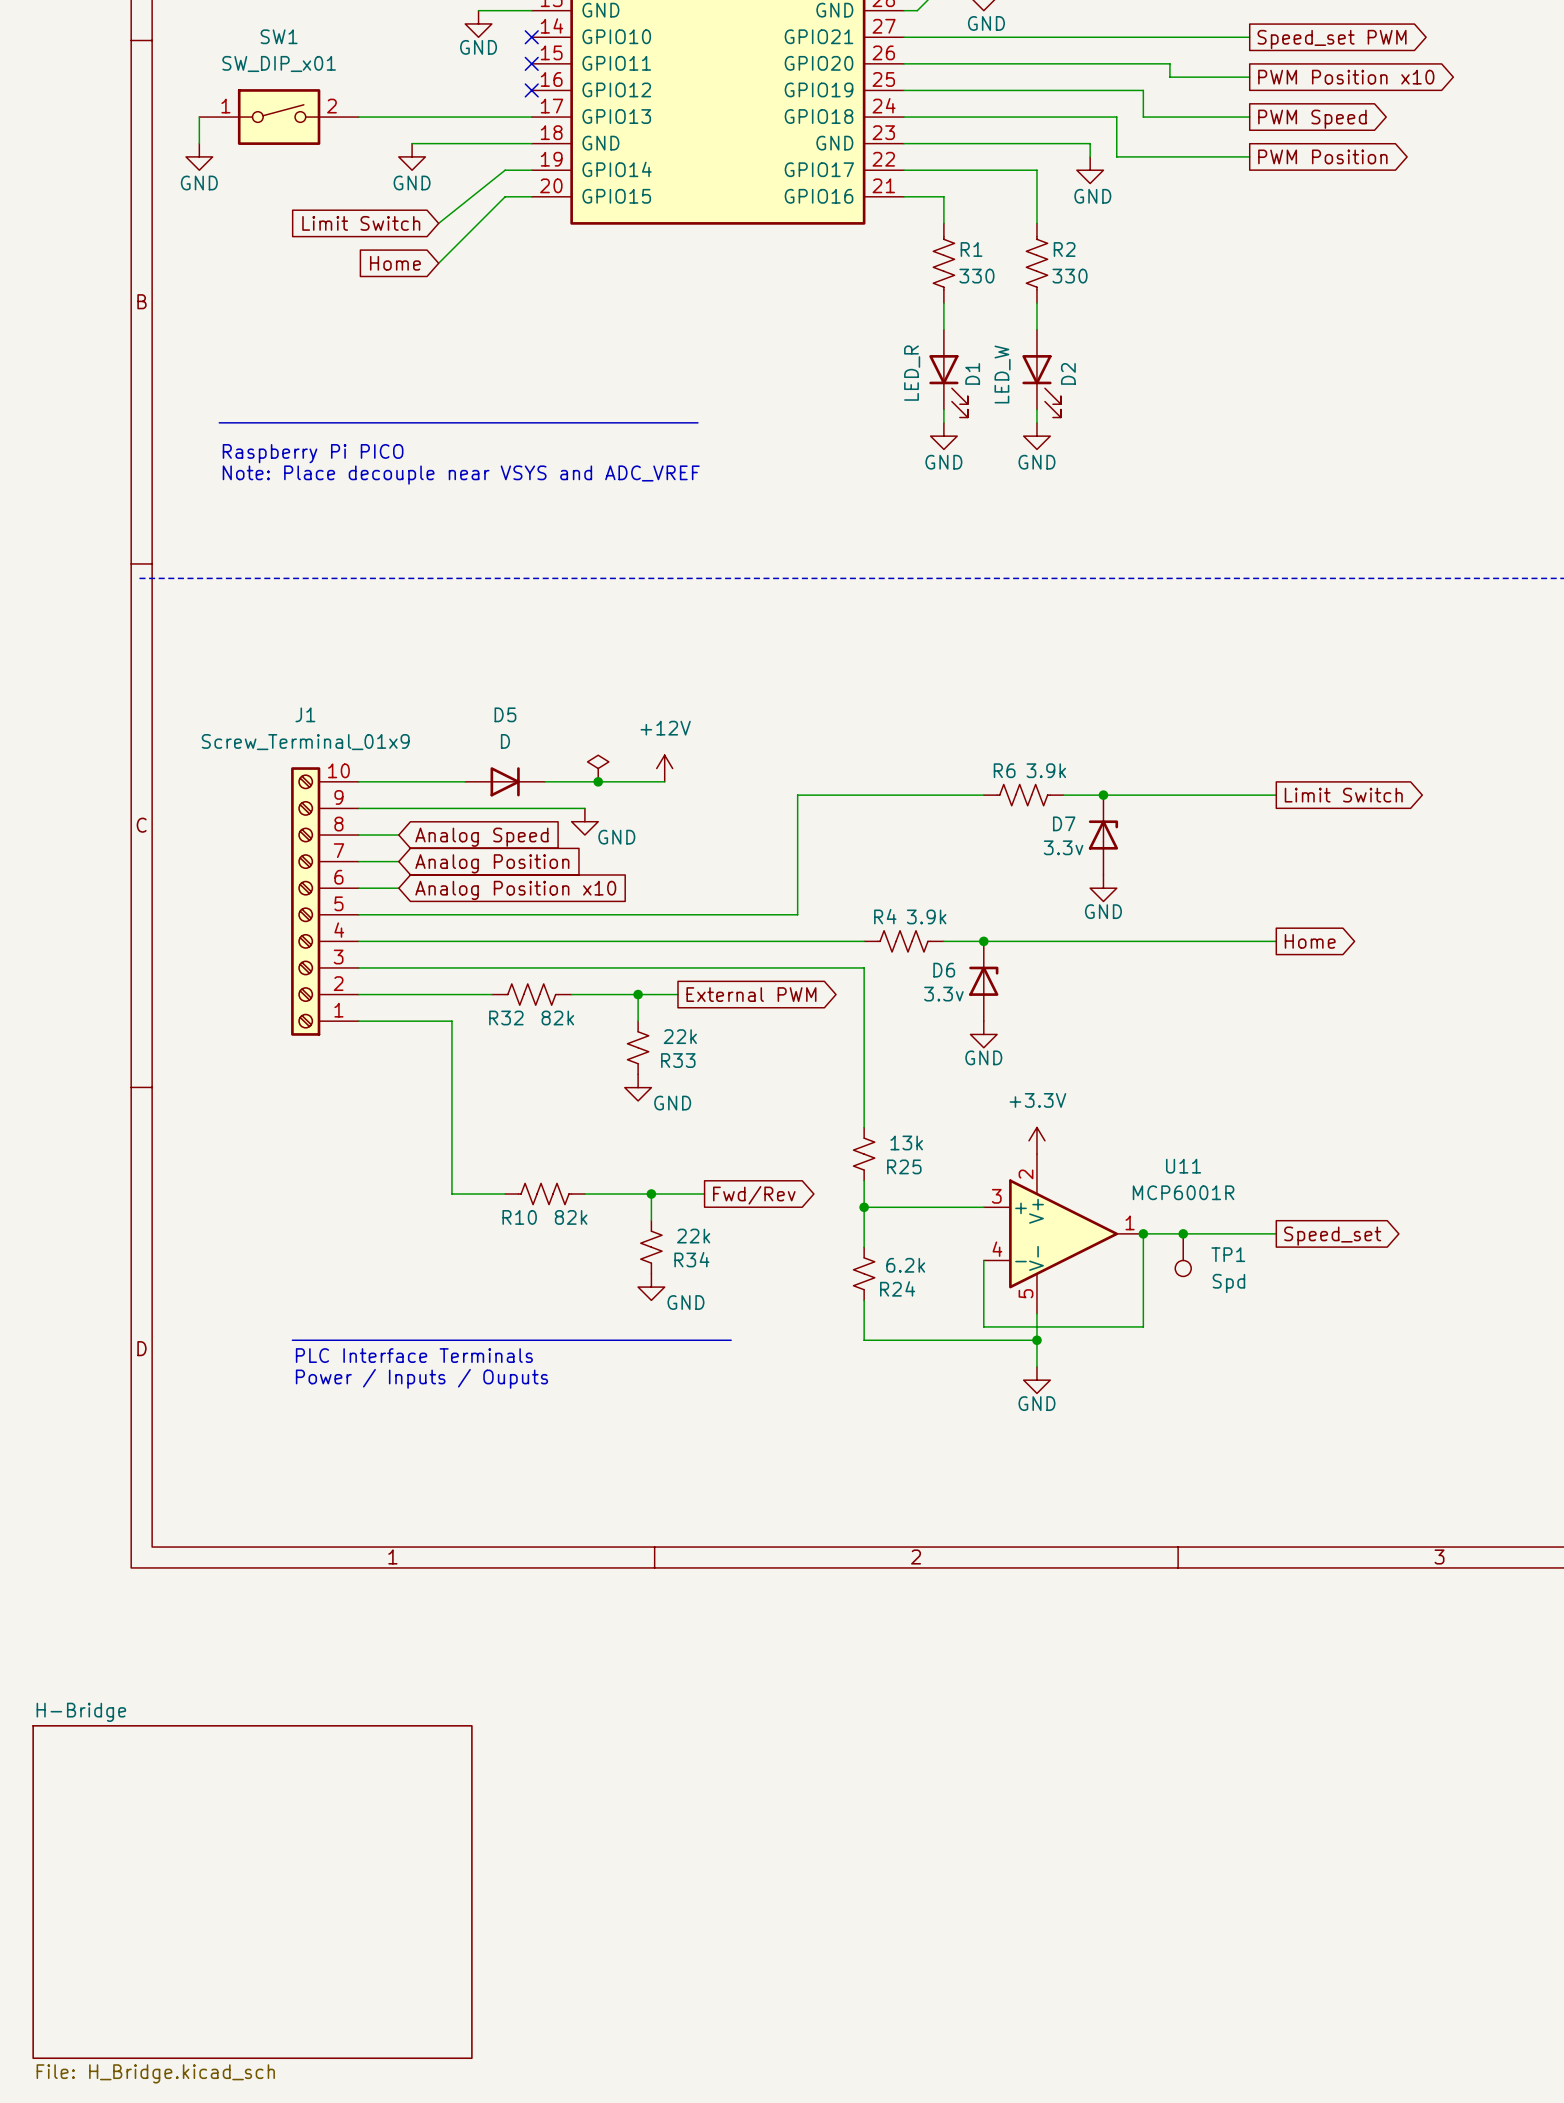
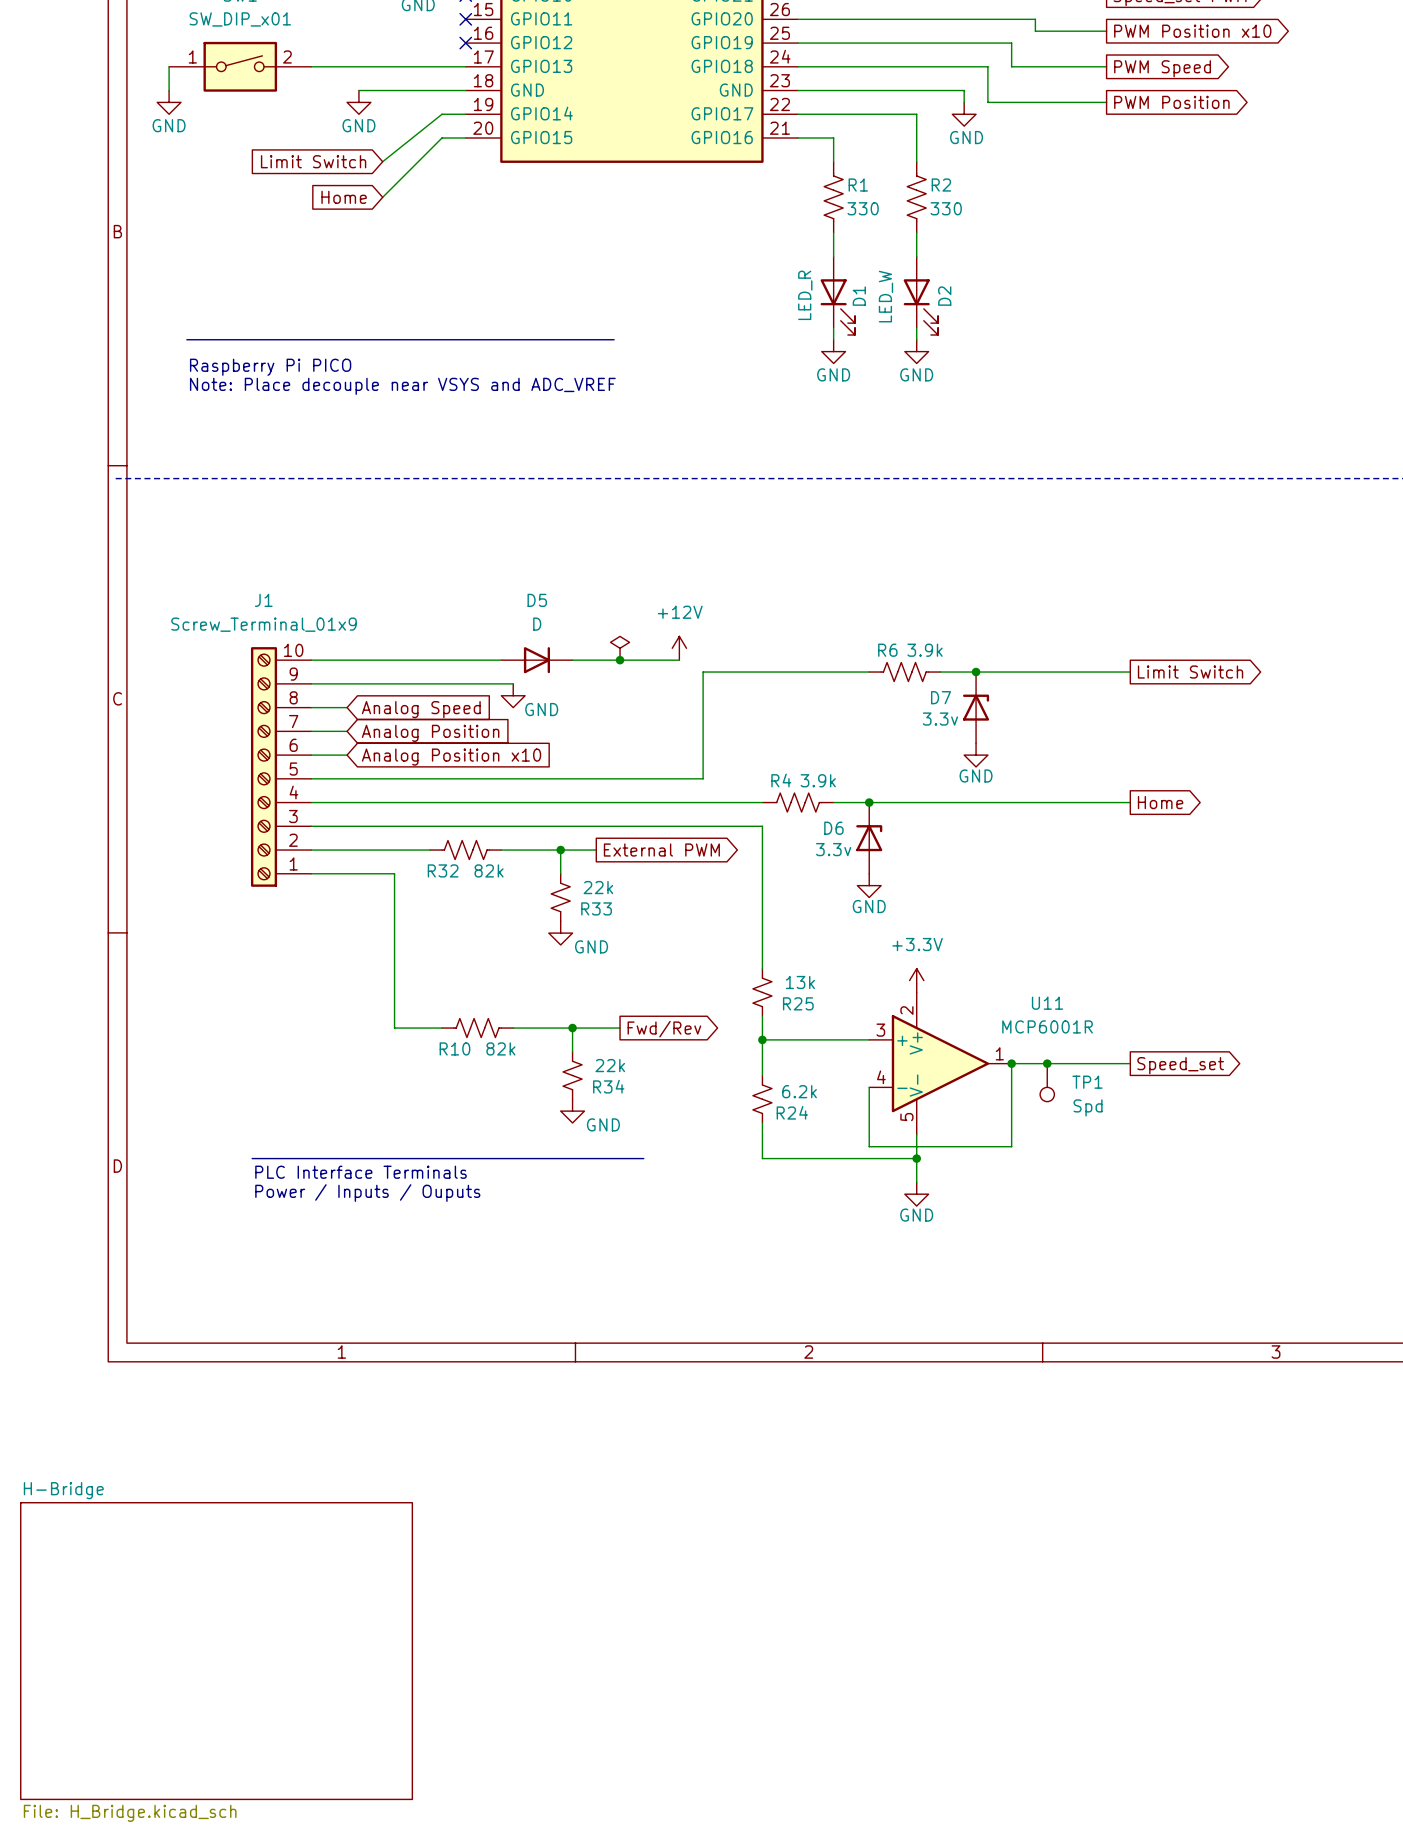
power symbol position: (598, 768) -> (620, 648)
power symbol position: +12V (664, 768) -> +12V (679, 648)
D5 position: (505, 781) -> (536, 660)
junction: (598, 781) -> none
wire: none -> (584, 660) (679, 660)
junction: none -> (620, 660)

